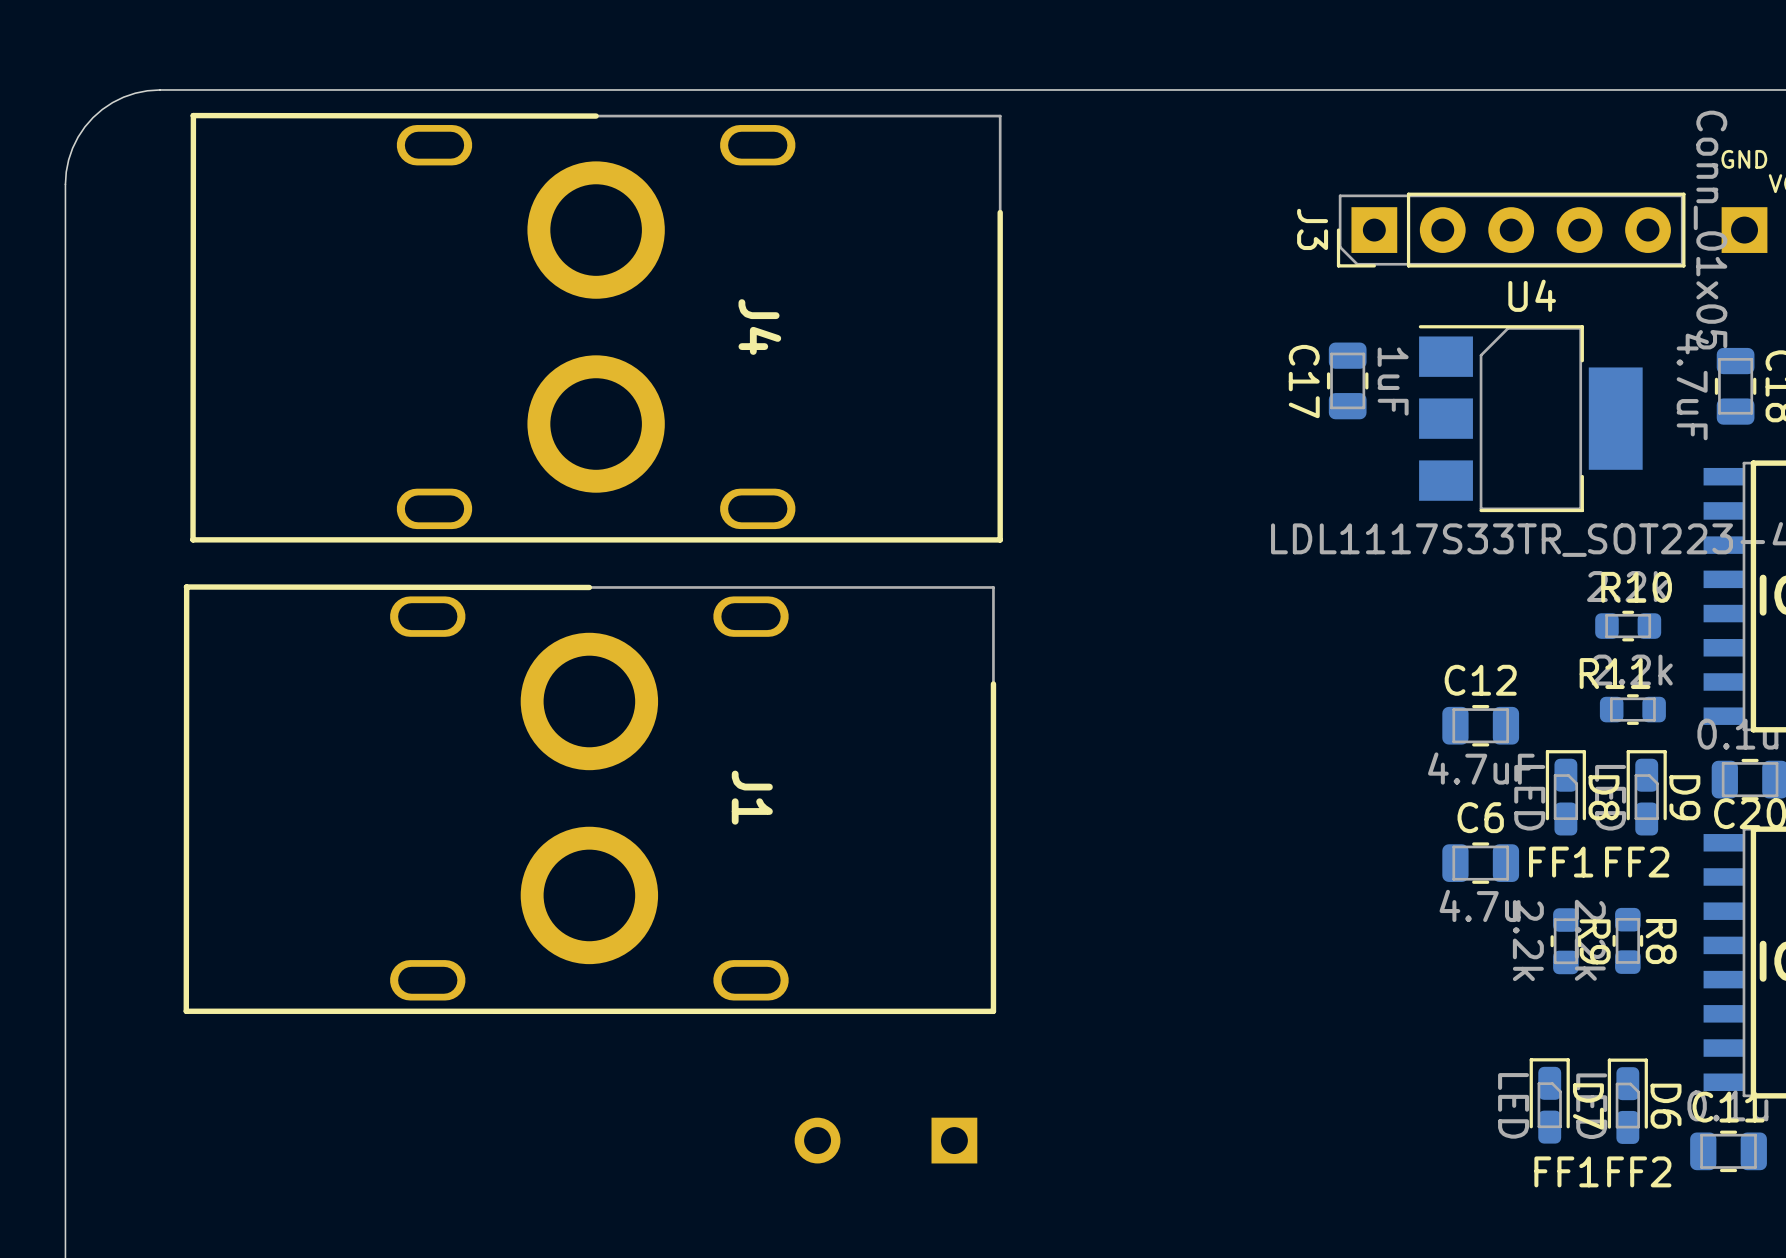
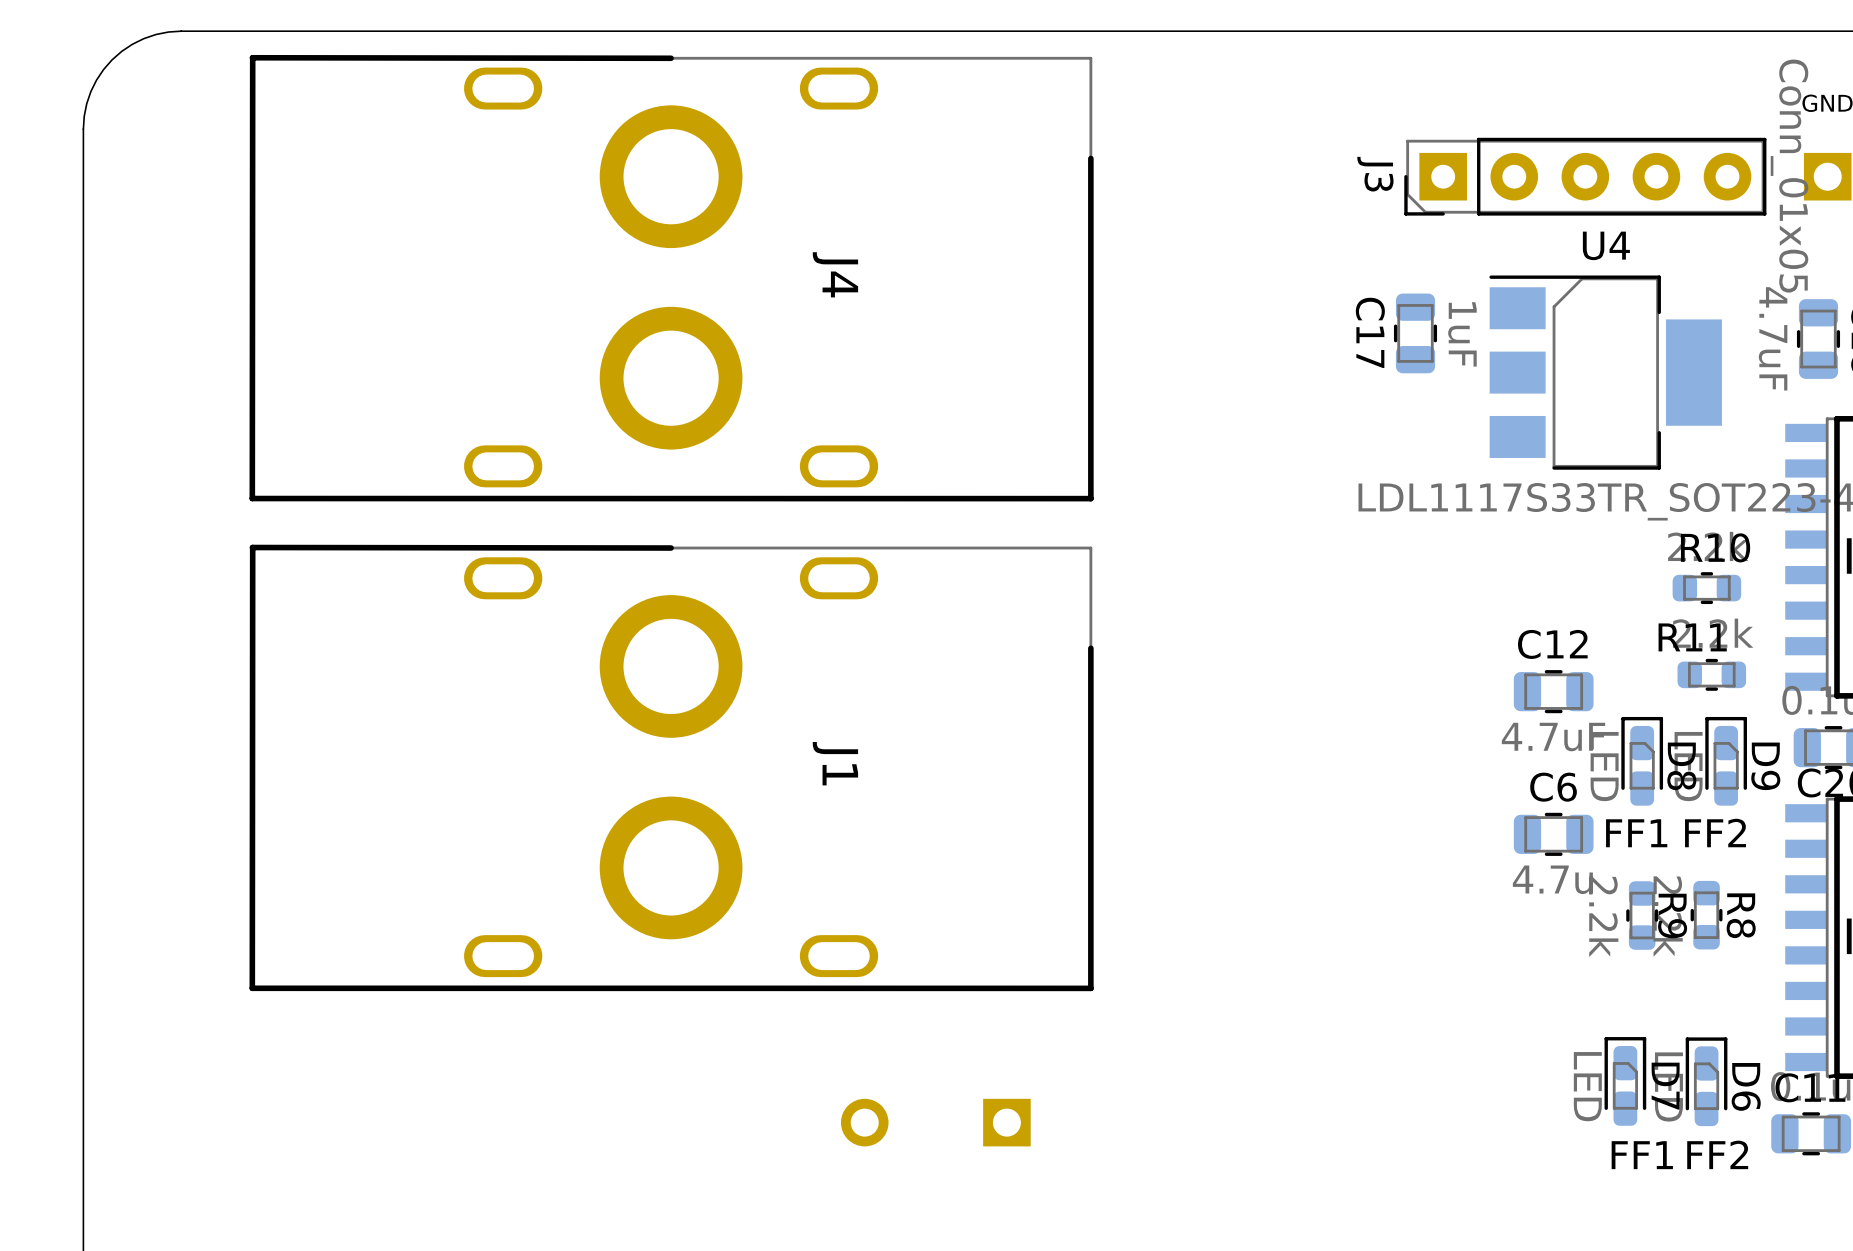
J4 position: (596, 327) -> (671, 278)
J1 position: (589, 799) -> (671, 767)

